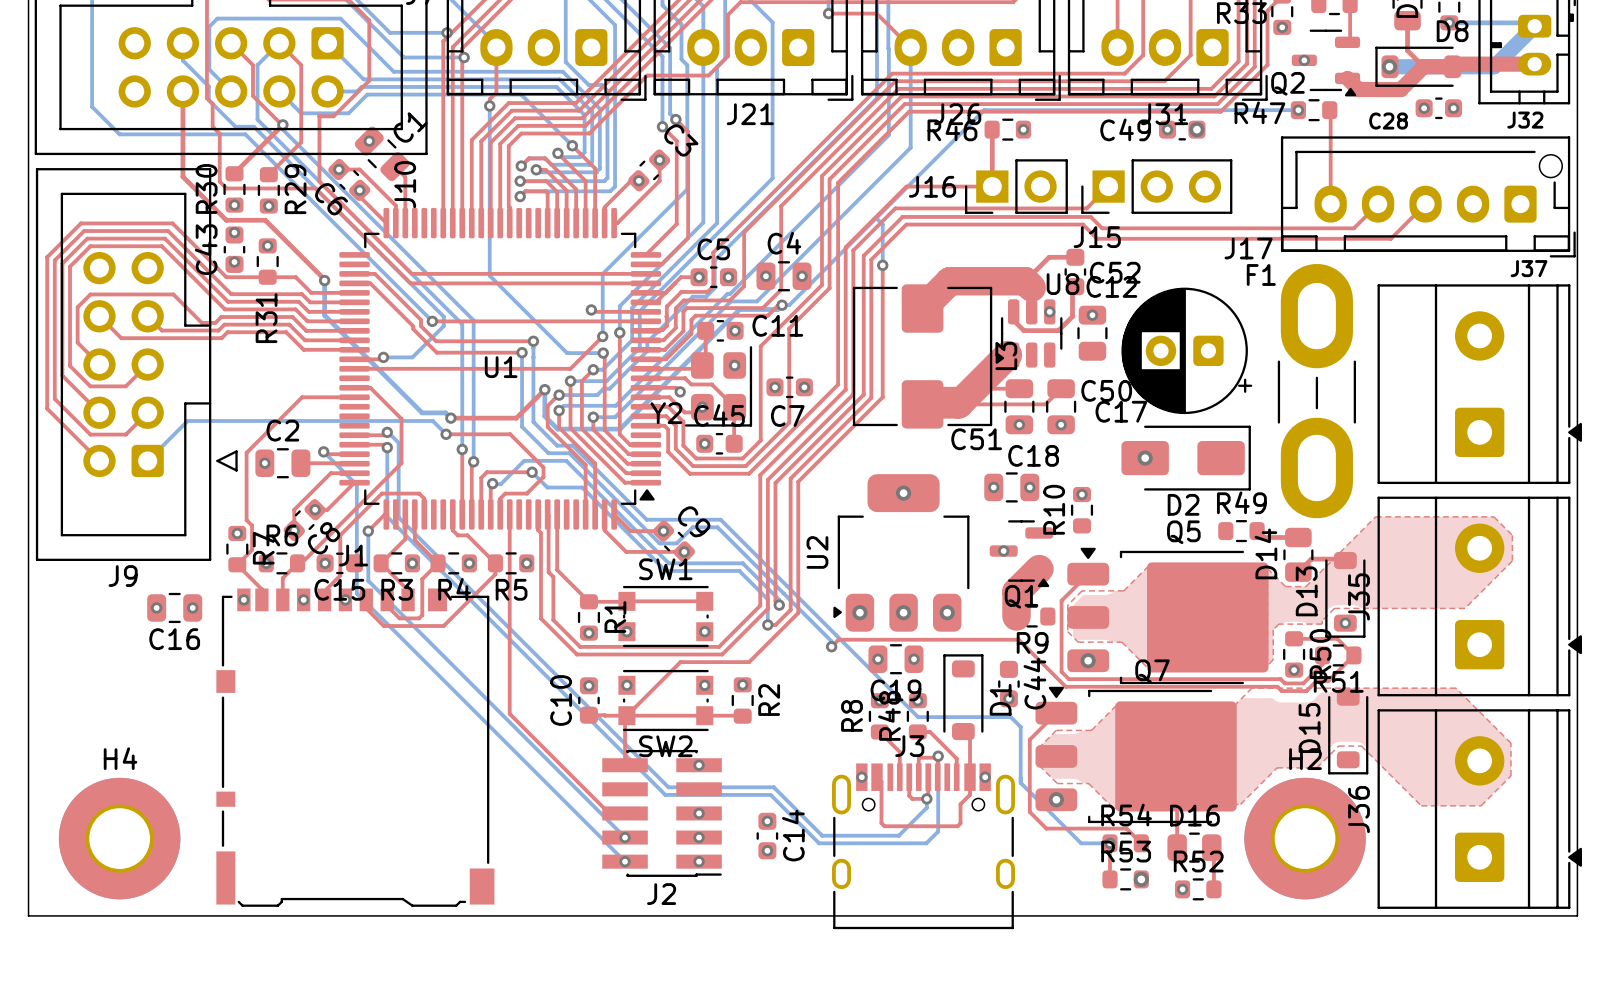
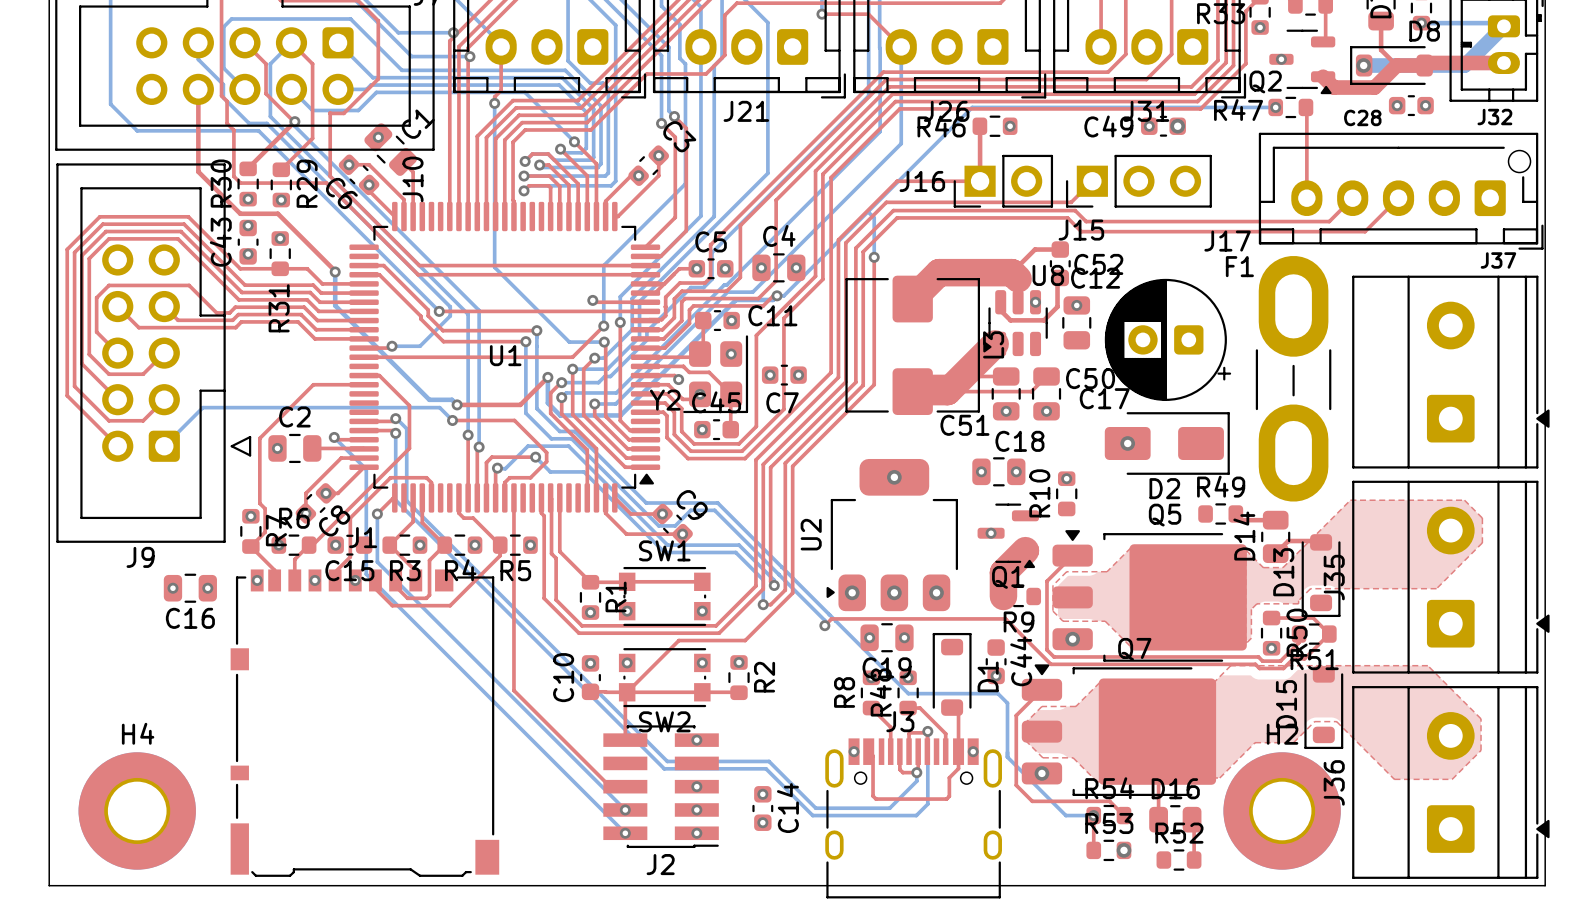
via: (1345, 623) -> none
via: (1182, 889) -> none

